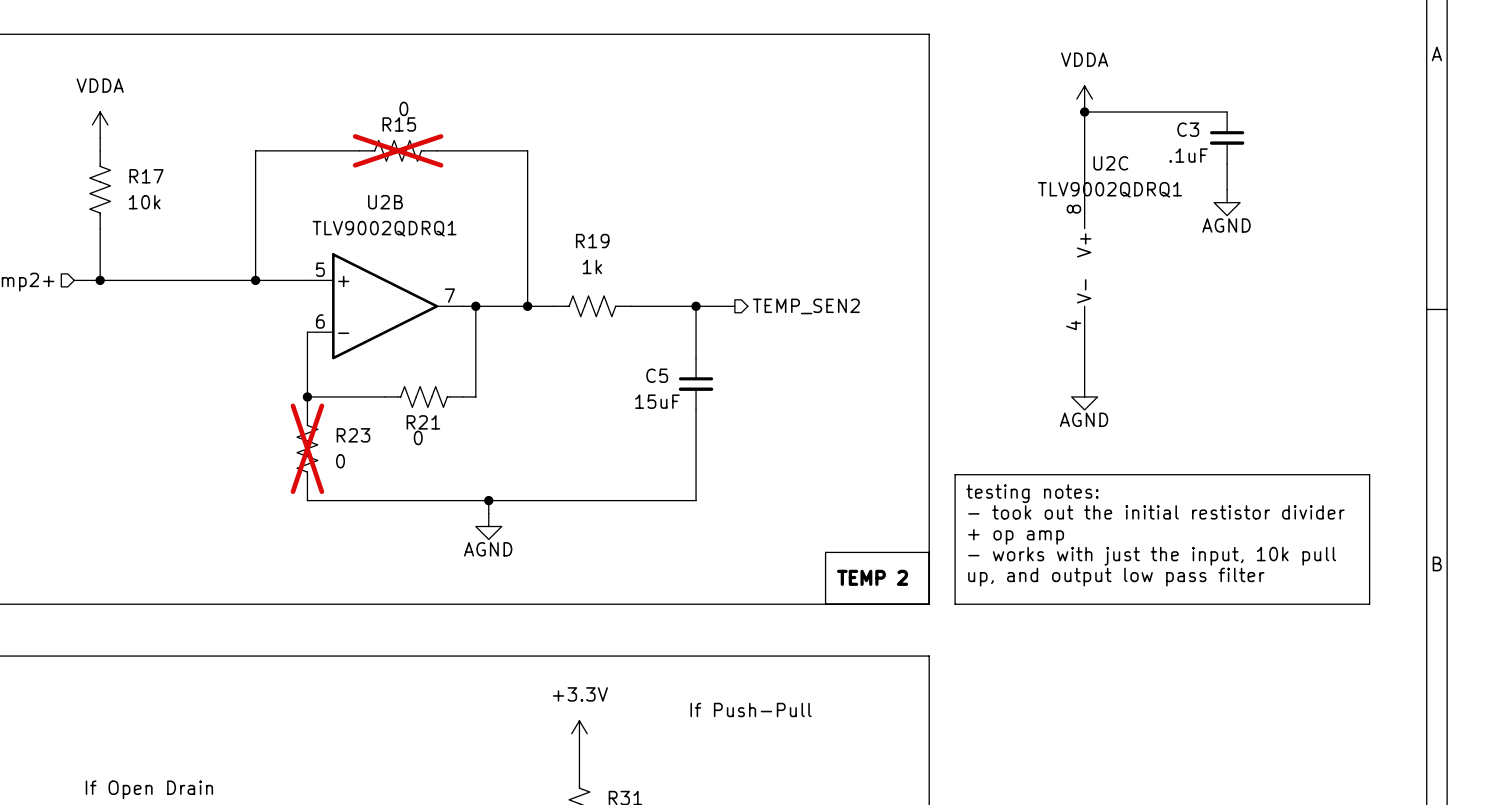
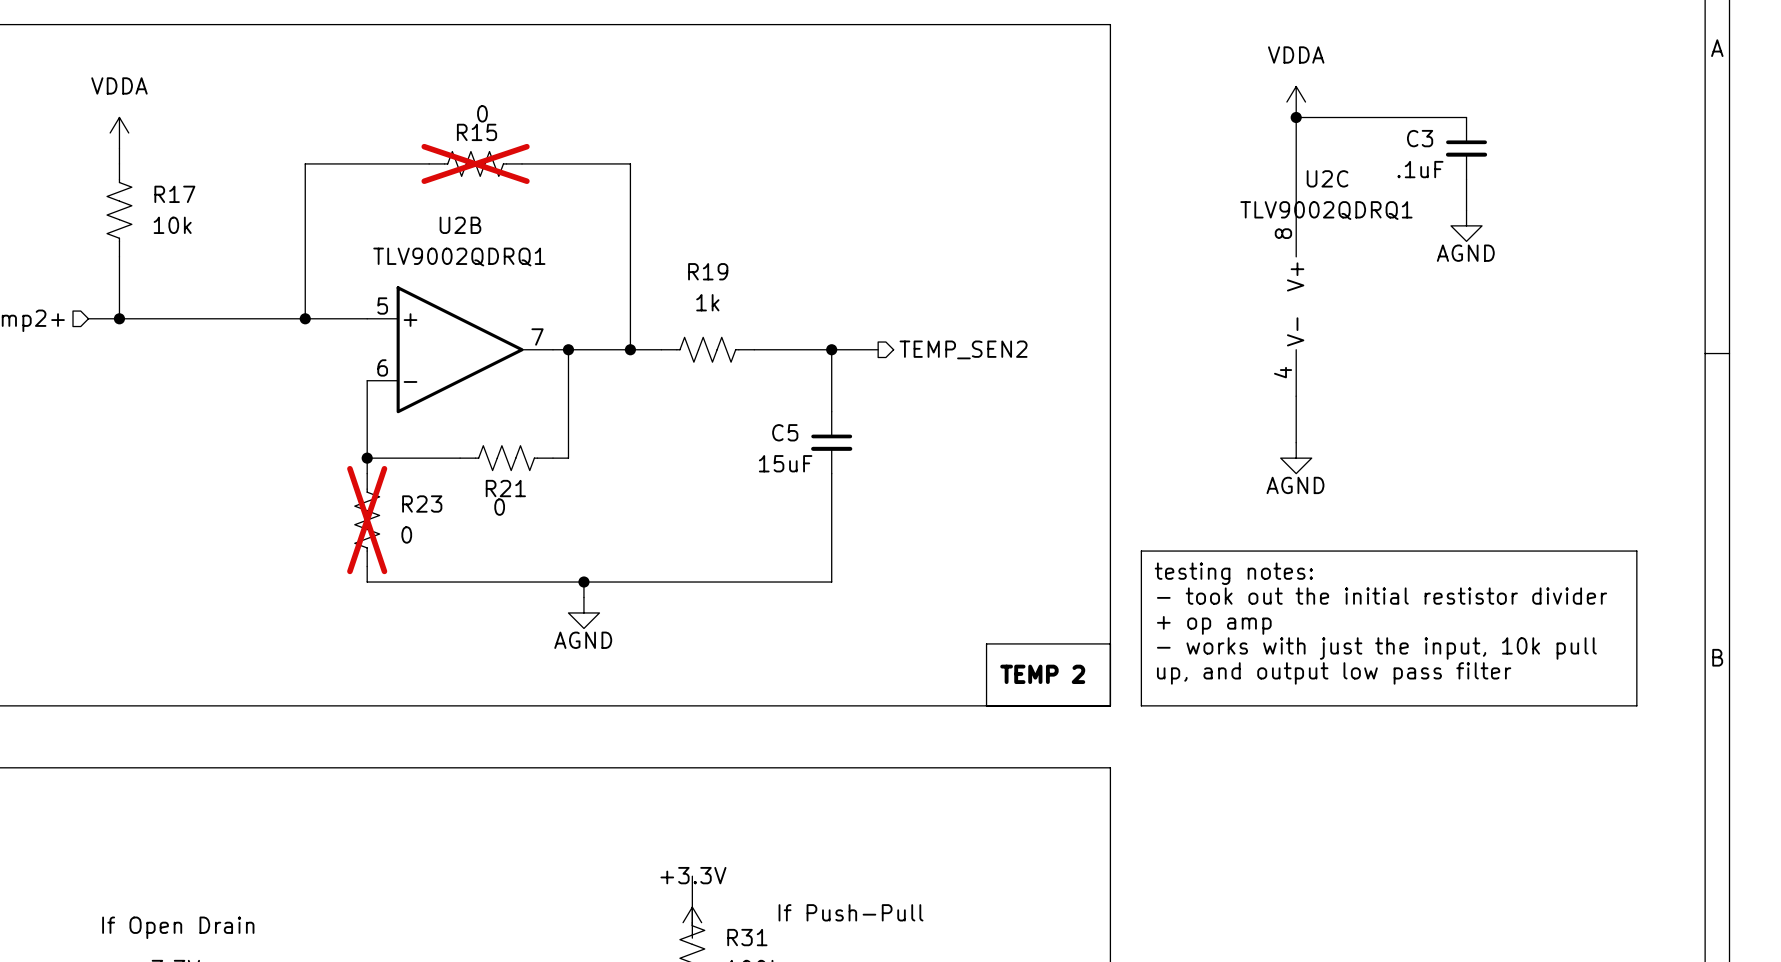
text position: If Push-Pull (751, 710) -> If Push-Pull (851, 912)
power symbol position: +3.3V (579, 733) -> +3.3V (692, 922)

